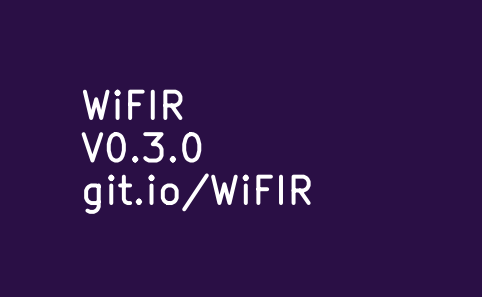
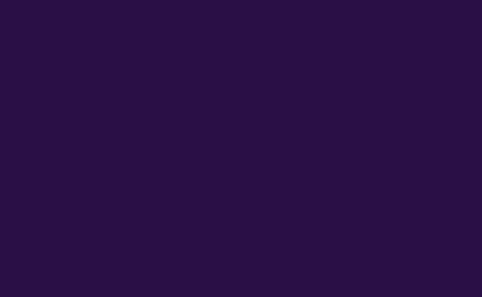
text: WiFIR (132, 104) -> none
text: V0.3.0 (141, 147) -> none
text: git.io/WiFIR (197, 193) -> none

